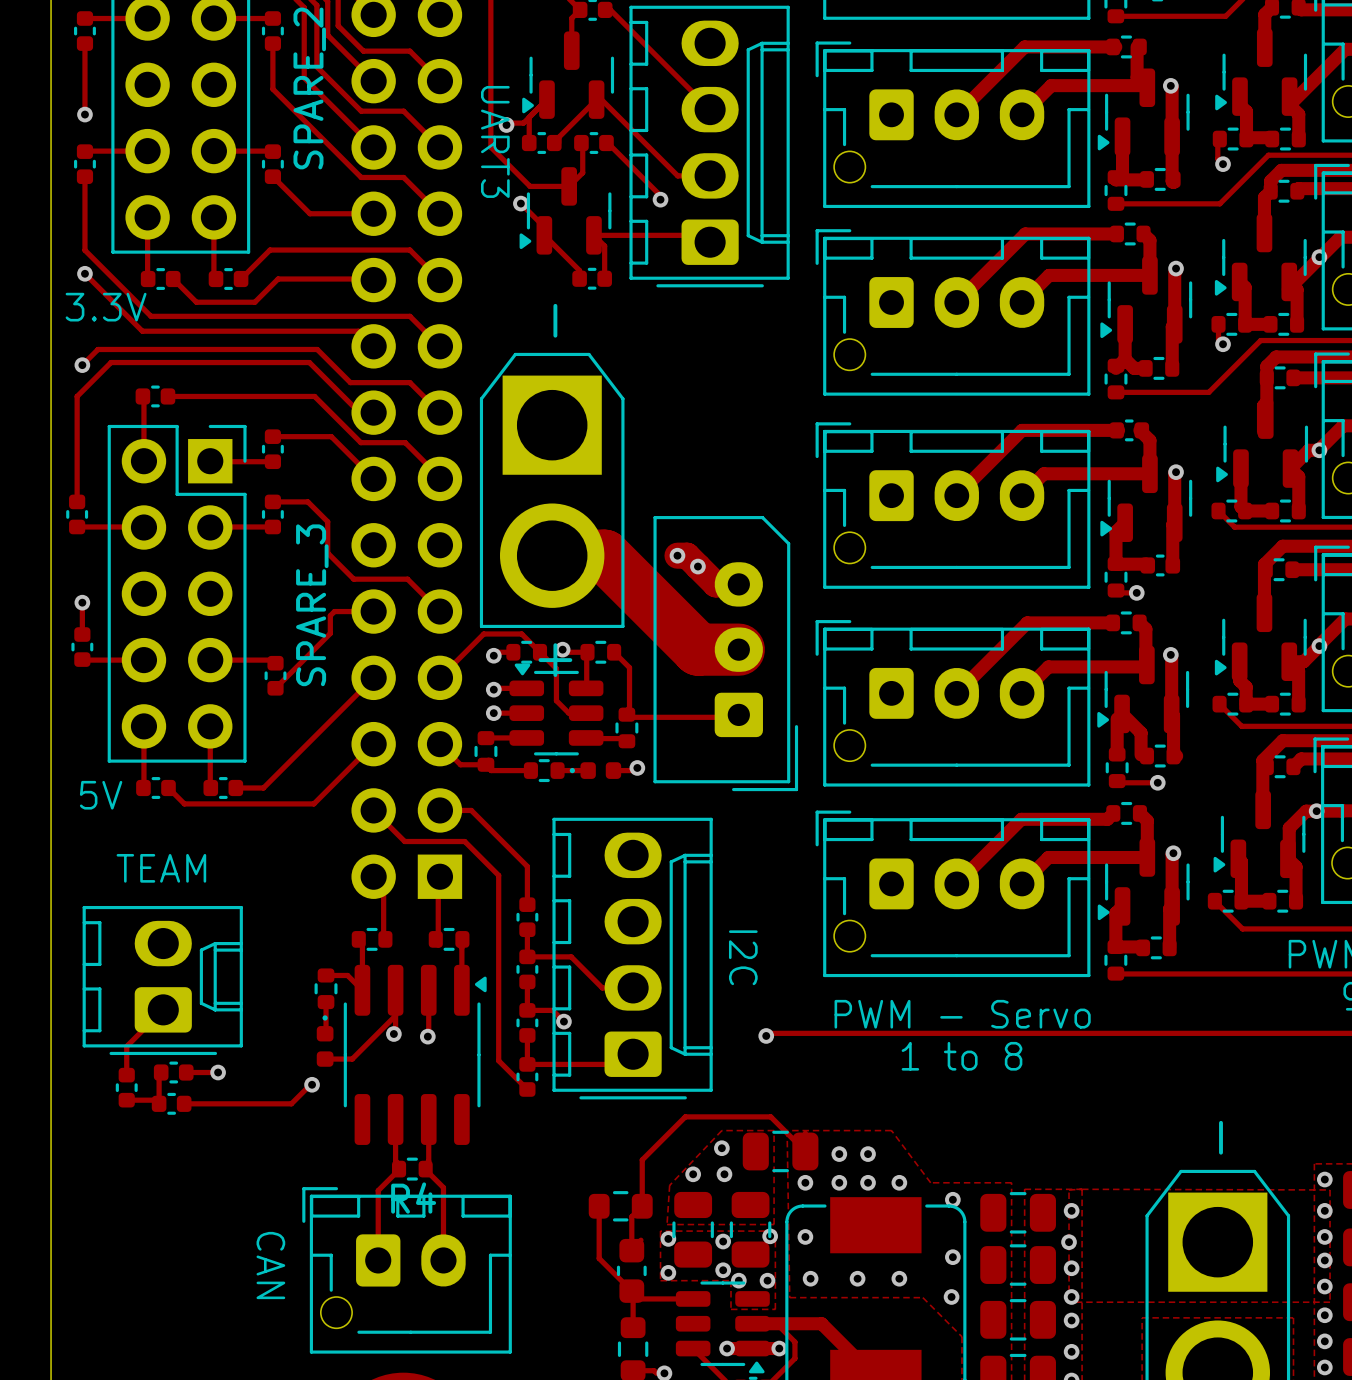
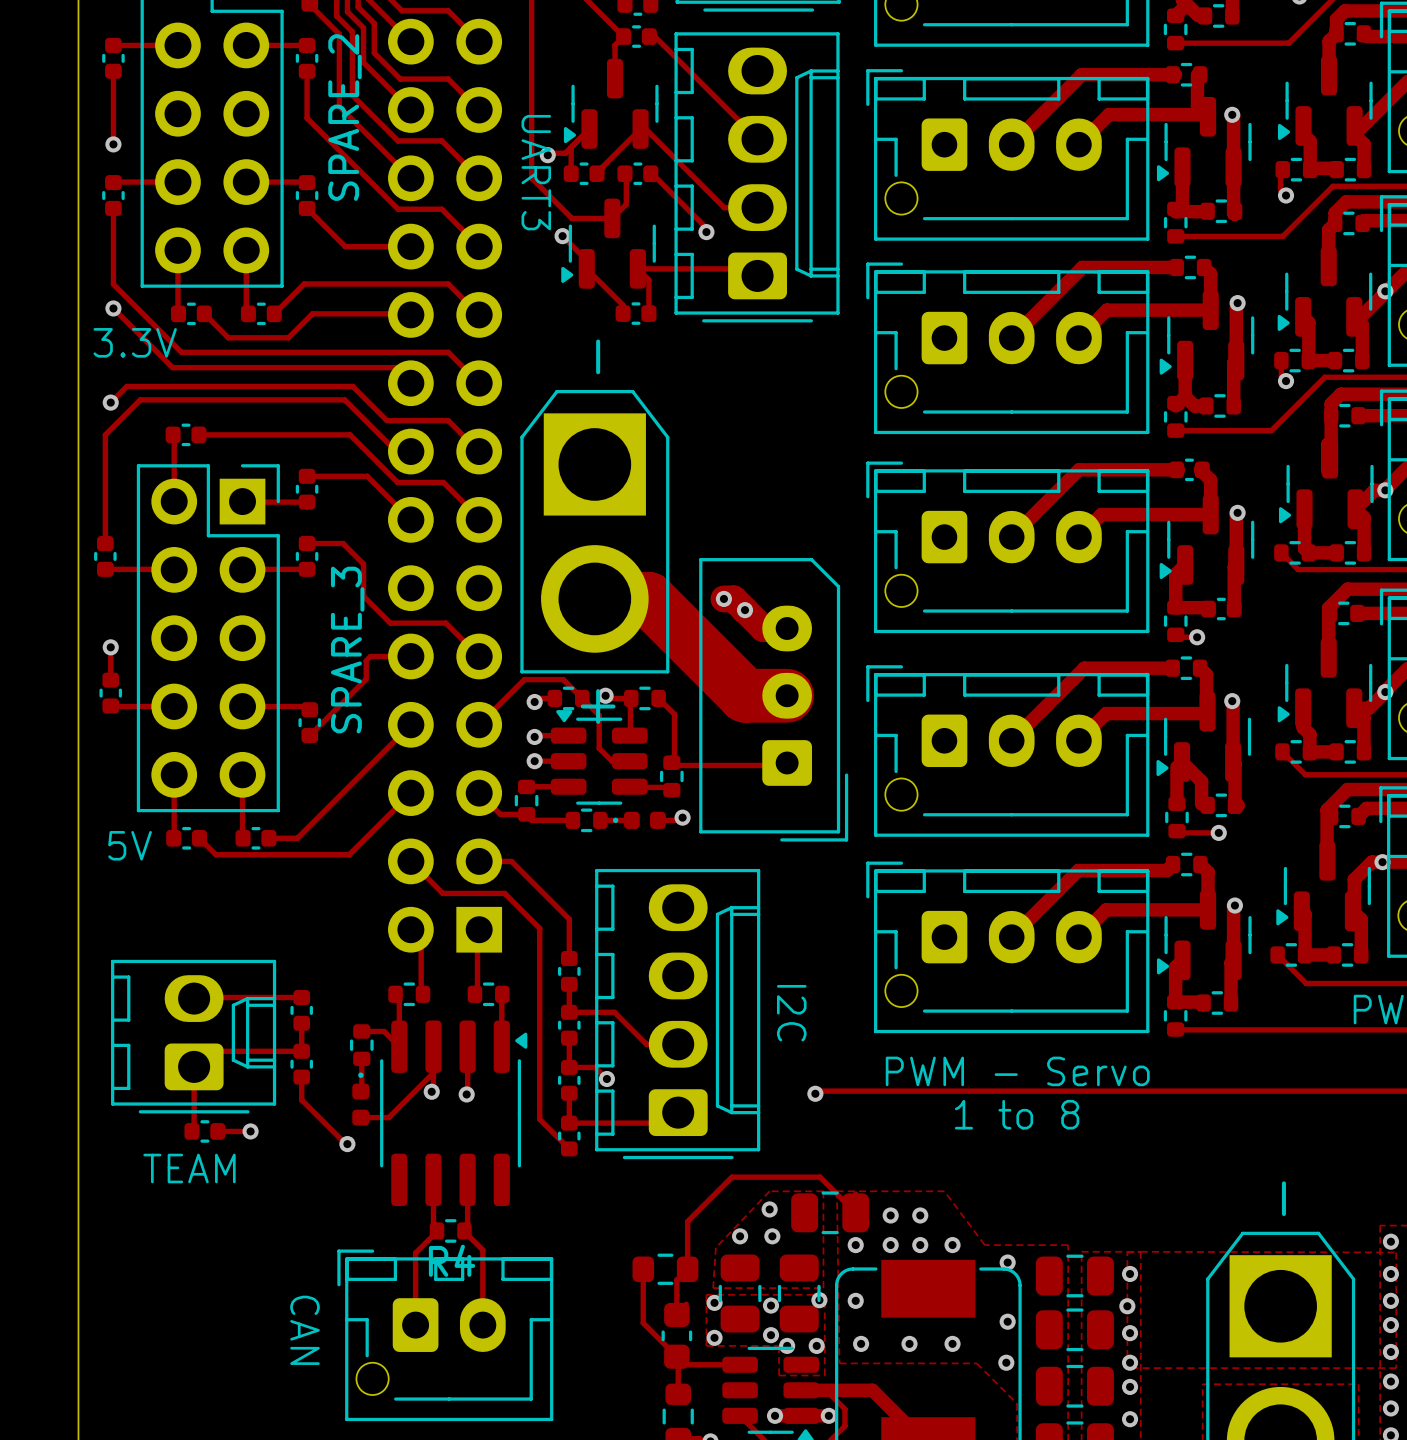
text position: TEAM (161, 868) -> TEAM (189, 1168)
track: none -> (195, 997) (301, 997)
part: none -> (301, 1010)
track: none -> (301, 1023) (301, 1051) (209, 1051)
part: none -> (301, 1064)
track: (163, 1009) (126, 1046) (126, 1075) -> (194, 1066) (194, 1129)
track: (161, 1072) (159, 1074) (159, 1103) (155, 1100) (126, 1100) -> none
track: (310, 1084) (291, 1103) (184, 1103) -> (345, 1144) (301, 1099) (301, 1077)
part: (126, 1087) -> none
part: (171, 1103) -> none

